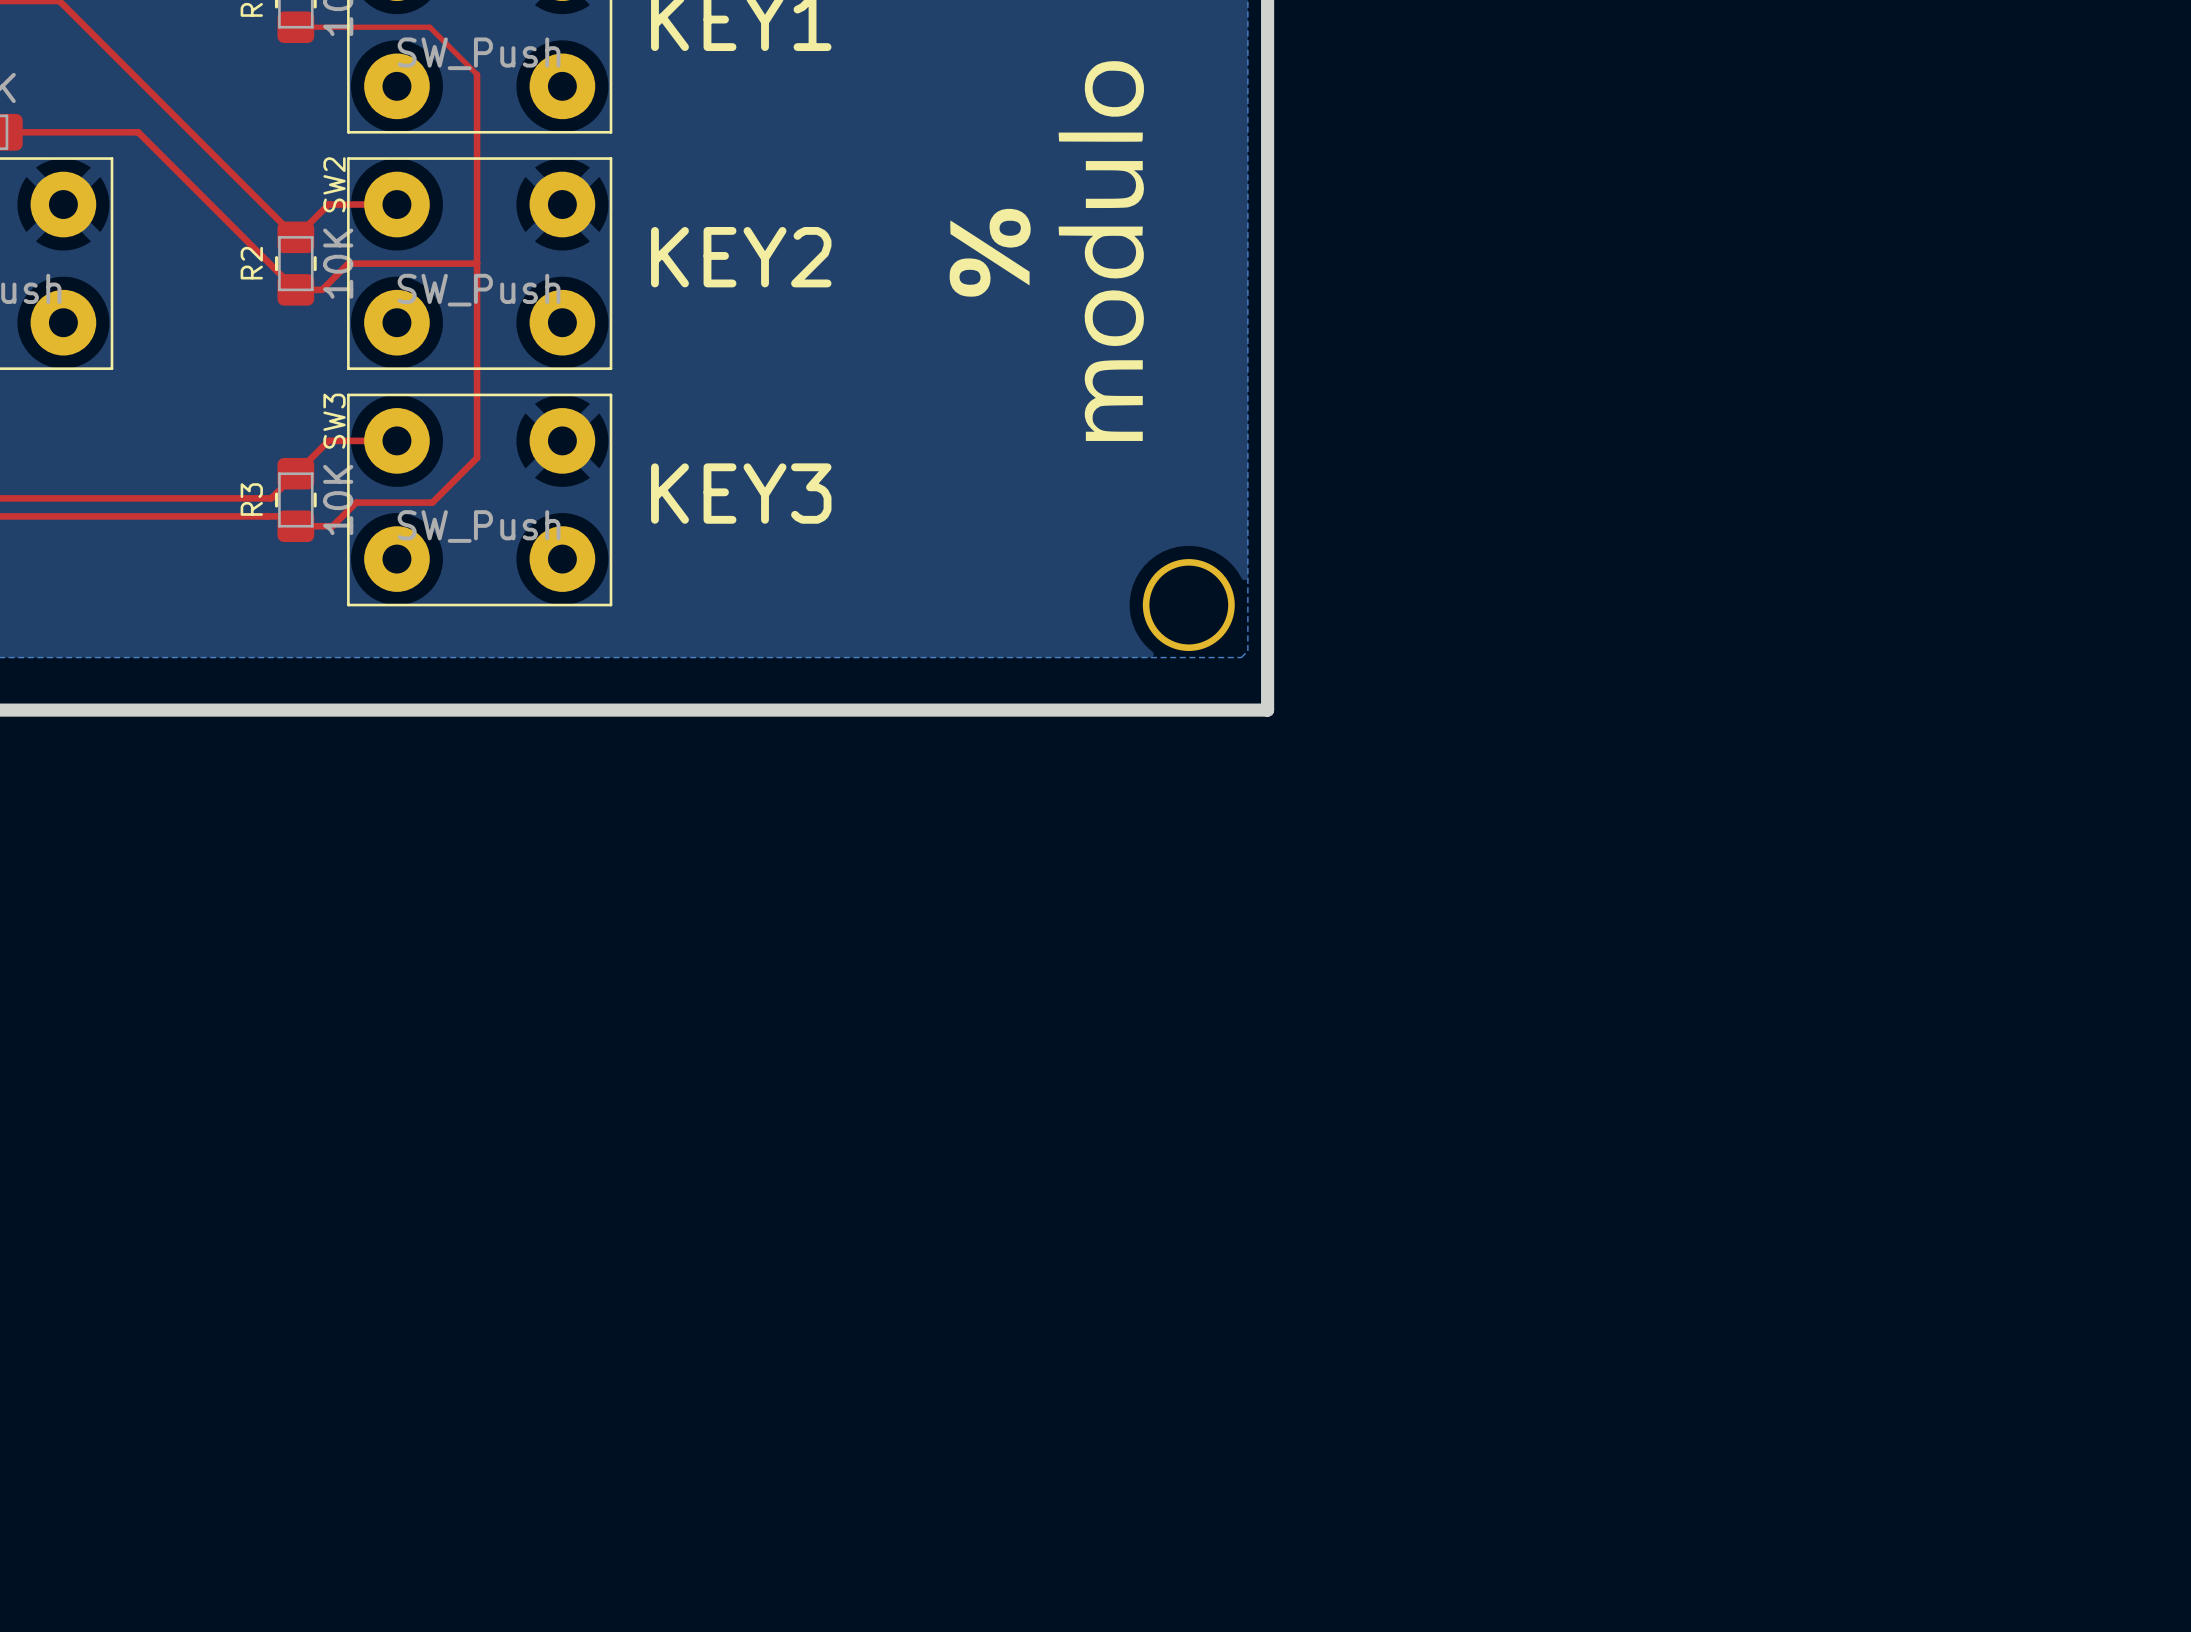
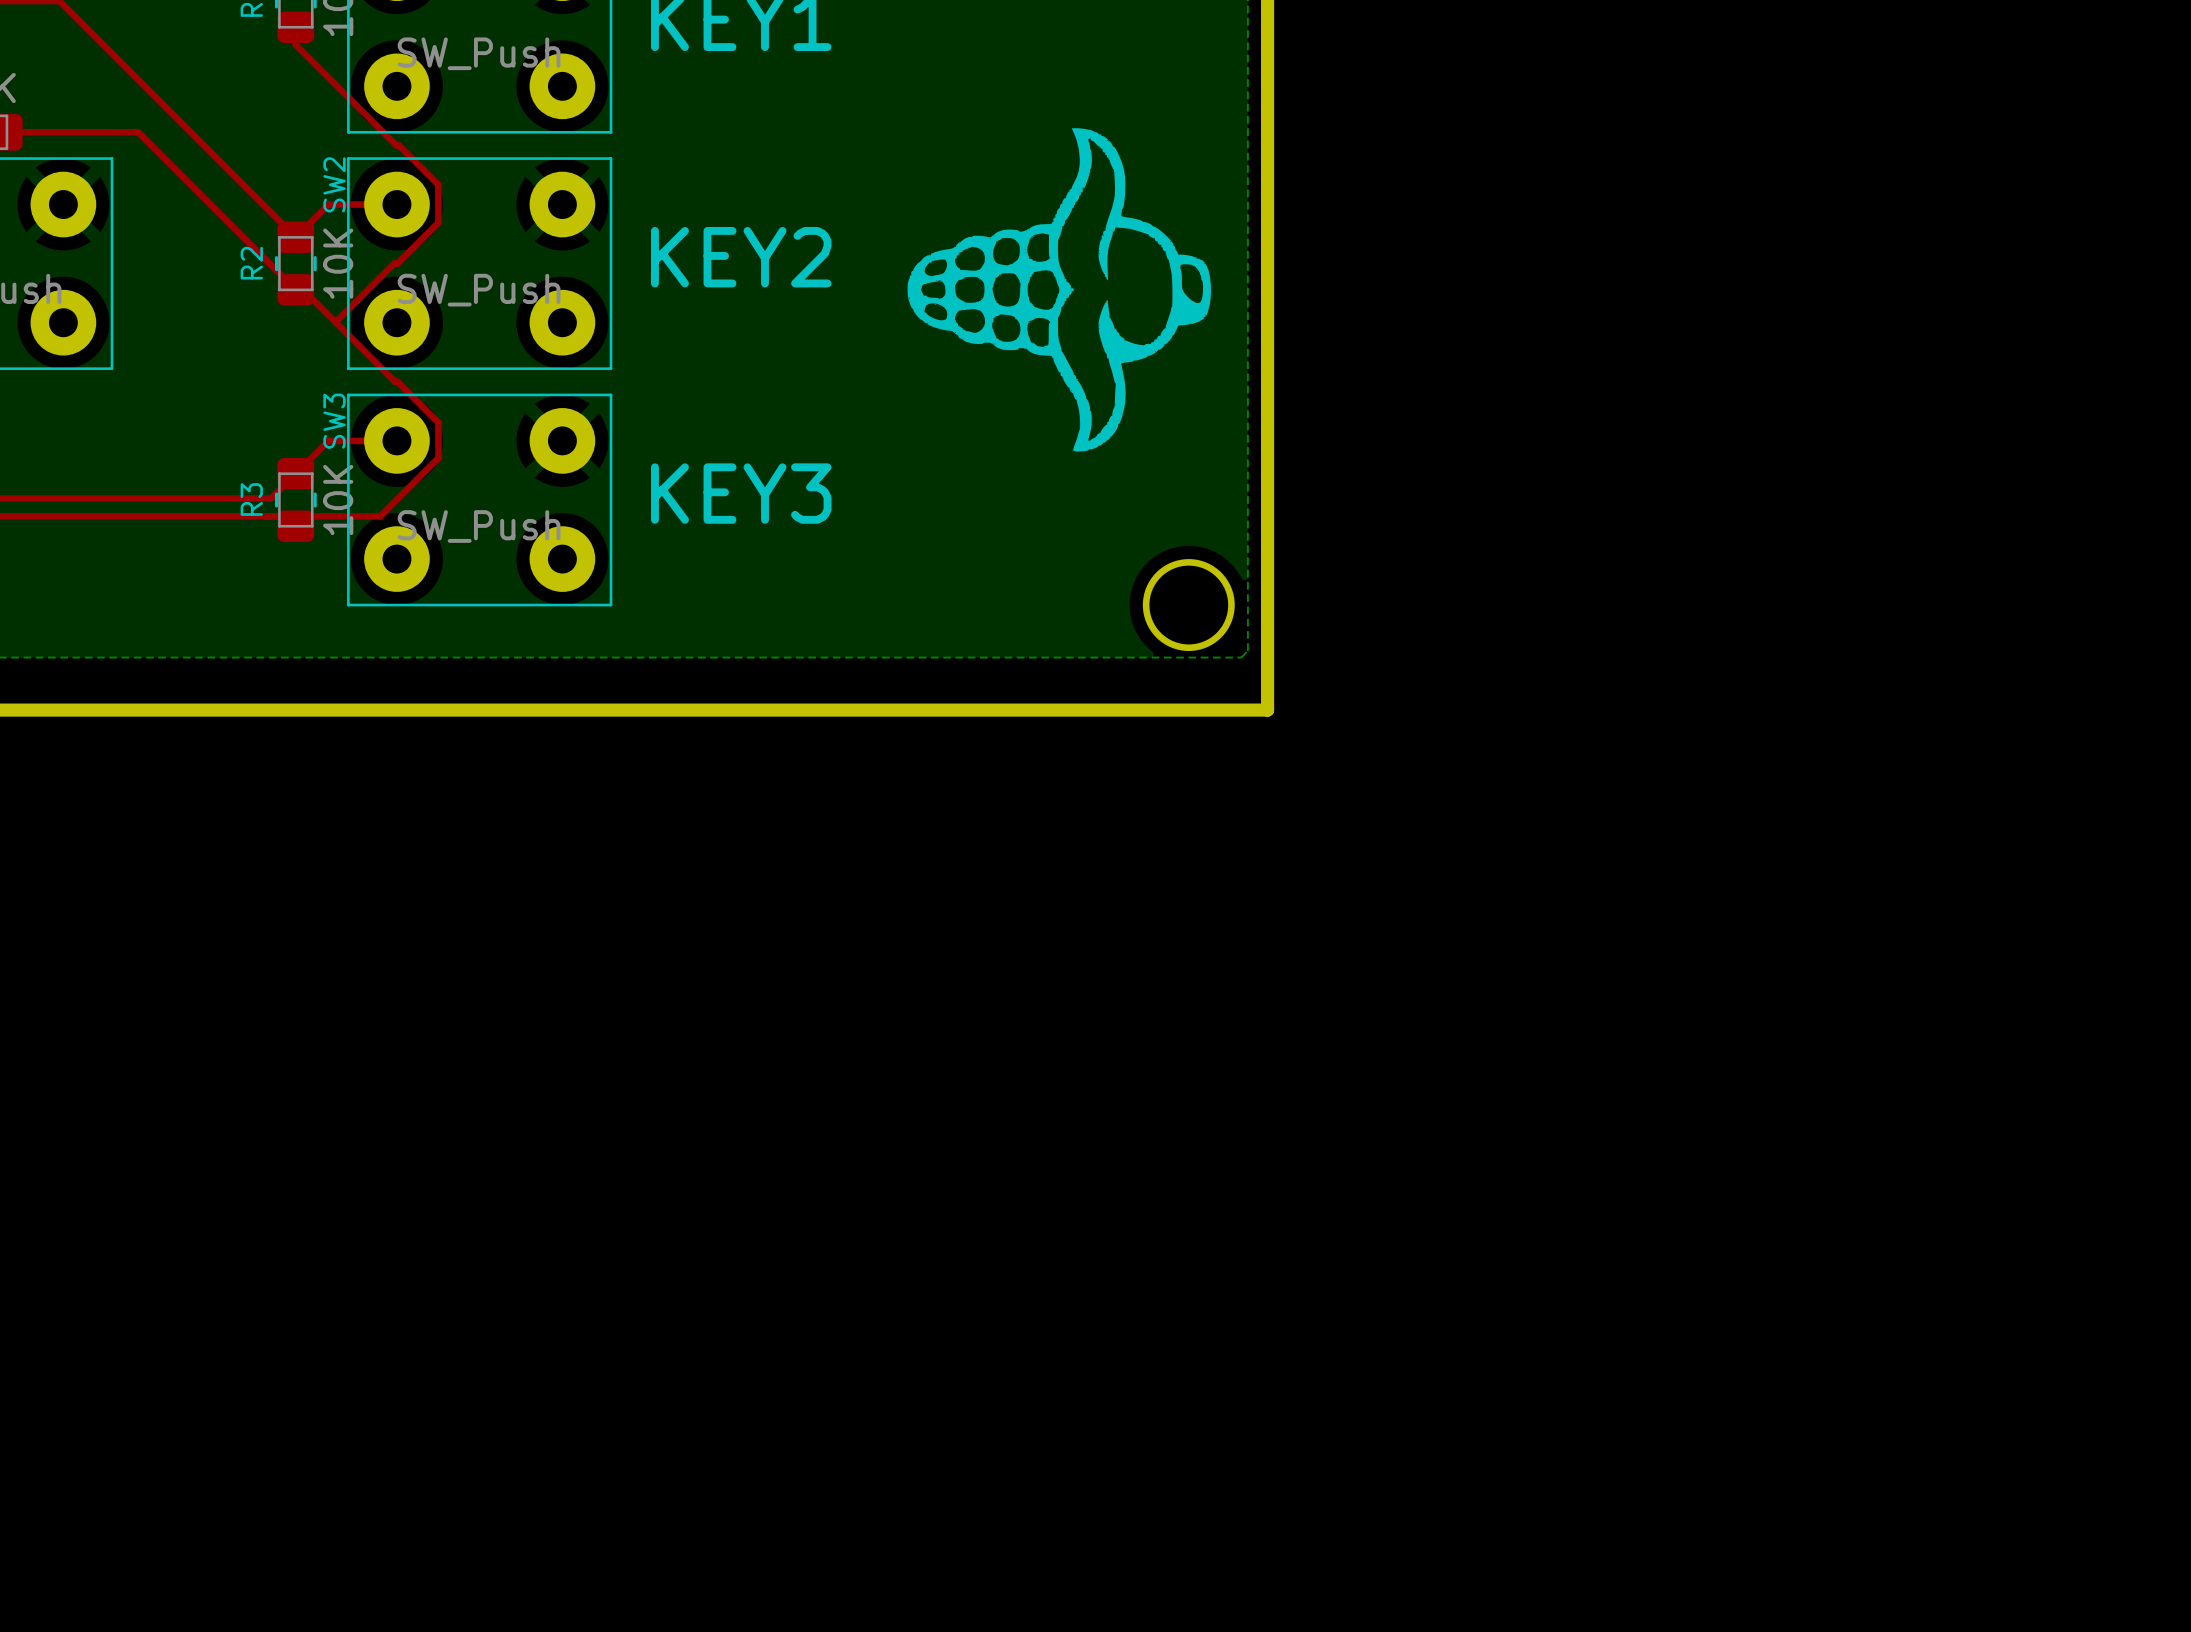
top track: (295, 27) (429, 27) (477, 74) (477, 457) (432, 502) (356, 502) (332, 526) (295, 526) -> (295, 27) (295, 44) (438, 184) (438, 222) (397, 263)
drawing: [949, 61, 1144, 441] -> none
drawing: none -> [907, 128, 1212, 452]
top track: (394, 263) (348, 263) (322, 289) (295, 289) -> (394, 263) (335, 322)
top track: (397, 263) (477, 263) -> none
top track: none -> (306, 300) (313, 300) (335, 322)
top track: none -> (335, 322) (438, 422) (438, 458) (380, 516) (285, 516)

